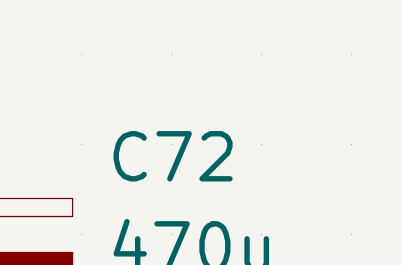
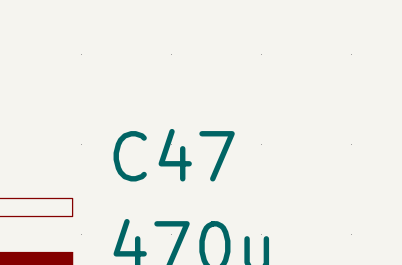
C72 name: C72 (173, 156) -> C47 (174, 155)

